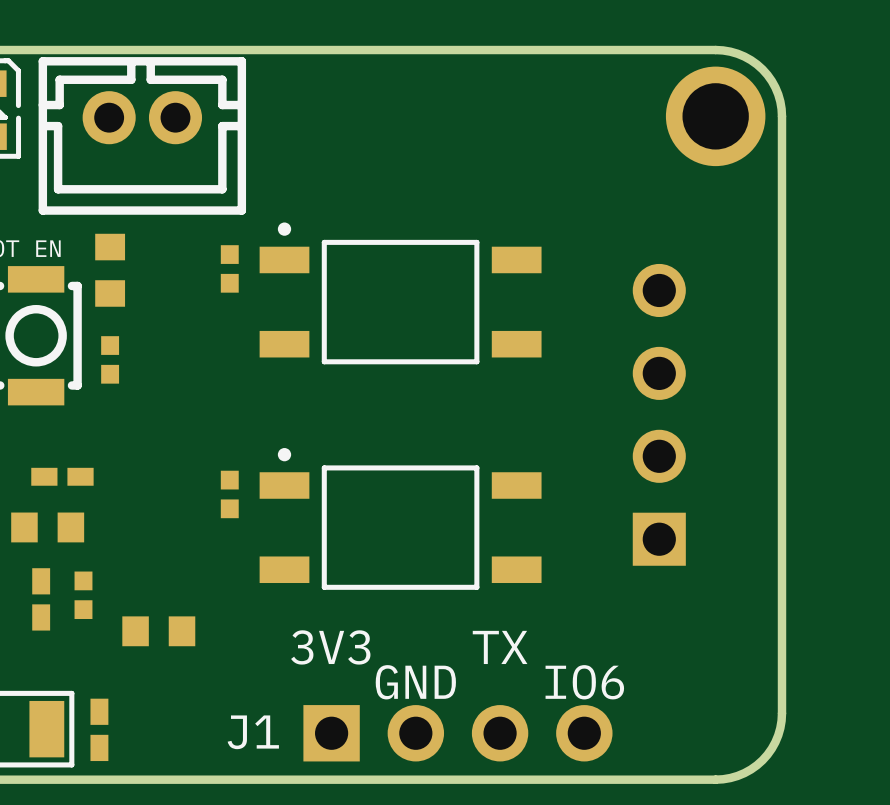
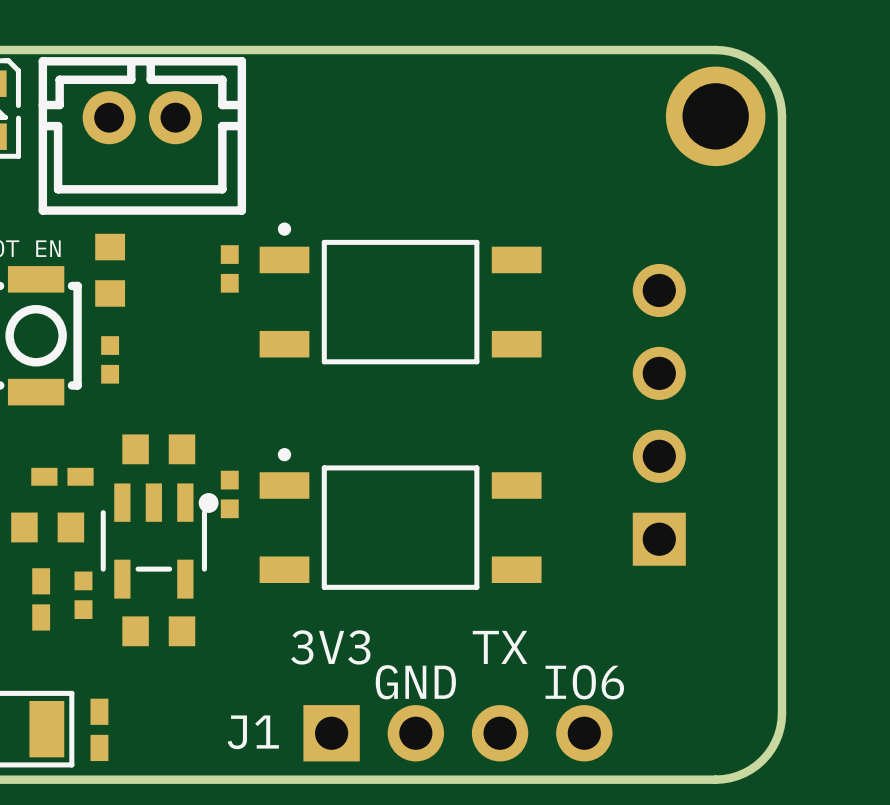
part: none -> (158, 449)
part: none -> (159, 541)

